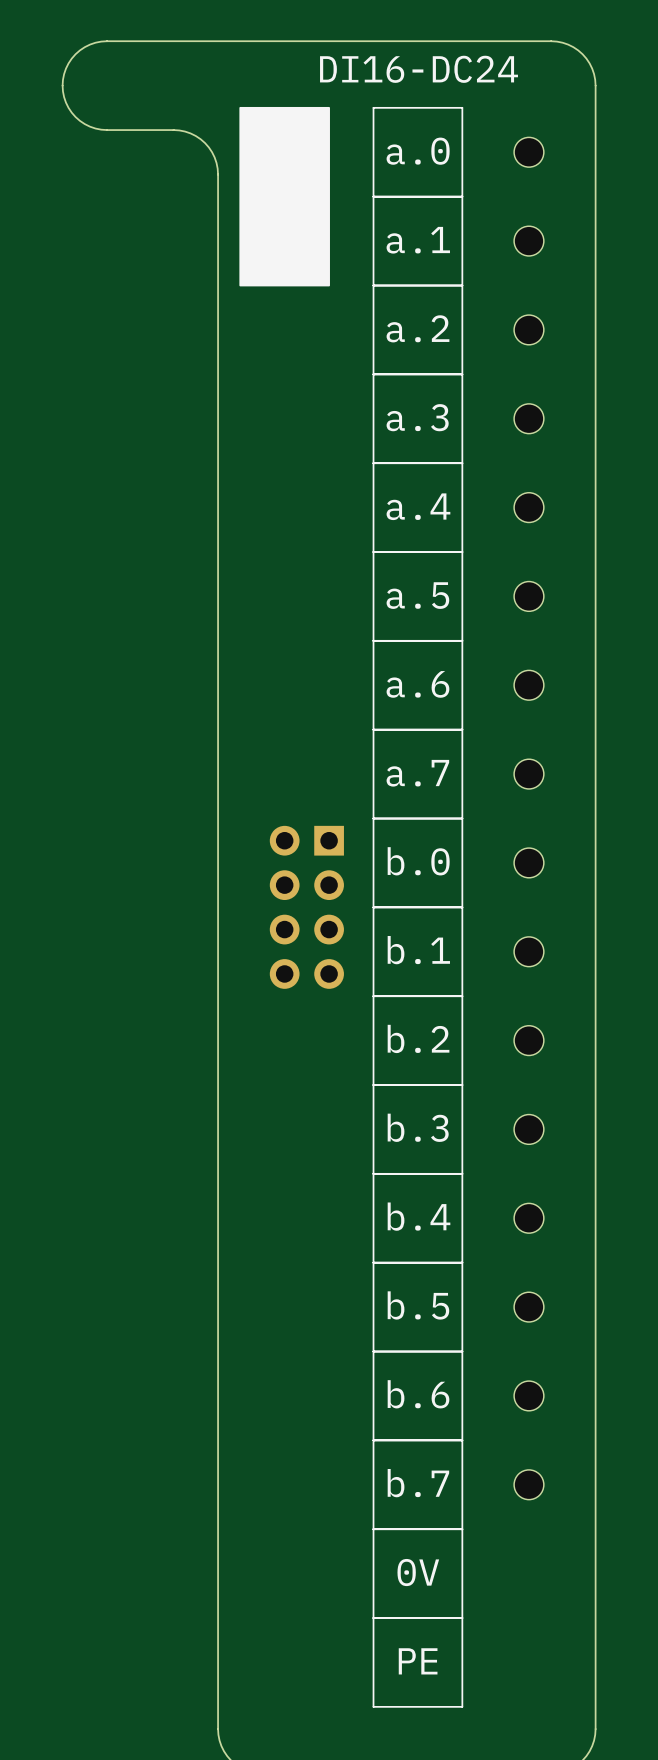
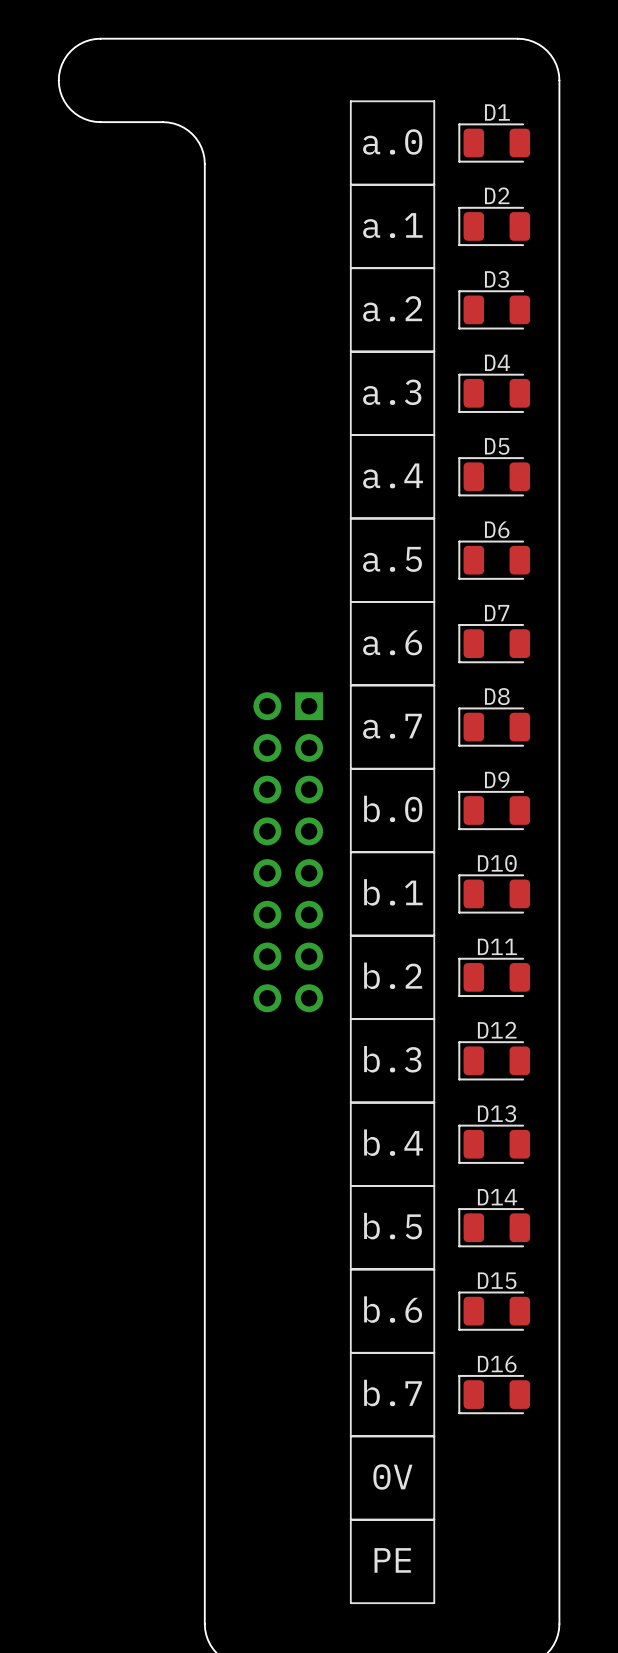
text: DI16-DC24 (419, 69) -> none
drawing: [239, 106, 330, 287] -> none
D1: none -> (494, 143)
part: (528, 152) -> none
D2: none -> (494, 226)
part: (528, 241) -> none
D3: none -> (494, 309)
part: (528, 329) -> none
D4: none -> (494, 393)
part: (528, 418) -> none
D5: none -> (494, 476)
part: (528, 507) -> none
D6: none -> (494, 560)
part: (528, 596) -> none
D7: none -> (494, 643)
part: (528, 685) -> none
D8: none -> (494, 727)
part: (528, 774) -> none
part footprint: [269, 825, 344, 989] -> [253, 692, 324, 1013]
D9: none -> (494, 810)
part: (528, 862) -> none
D10: none -> (494, 893)
part: (528, 951) -> none
D11: none -> (494, 977)
part: (528, 1040) -> none
D12: none -> (494, 1060)
part: (528, 1129) -> none
D13: none -> (494, 1144)
part: (528, 1218) -> none
D14: none -> (494, 1227)
part: (528, 1307) -> none
D15: none -> (494, 1311)
part: (528, 1395) -> none
D16: none -> (494, 1394)
part: (528, 1484) -> none

